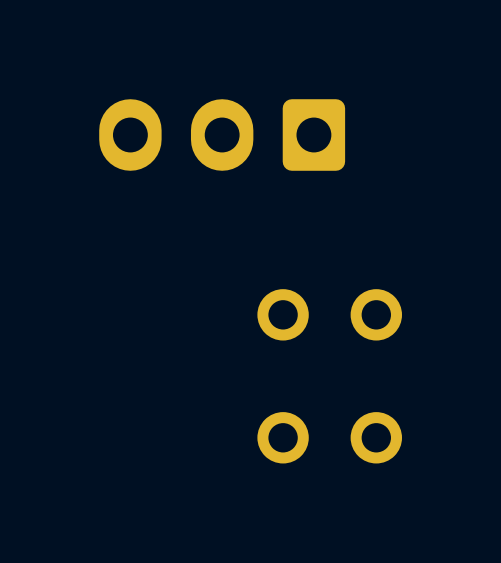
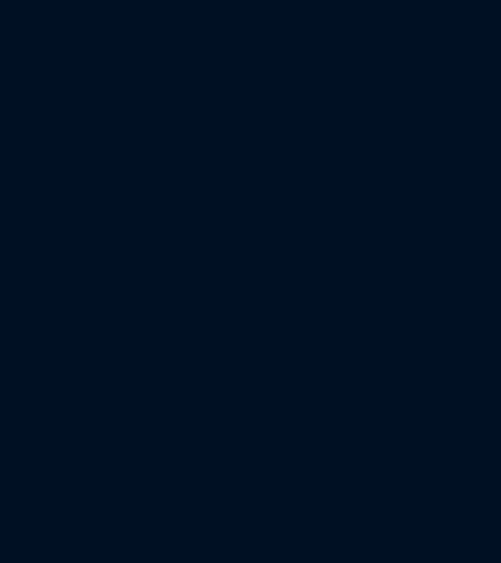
part: (222, 135) -> none
part: (329, 314) -> none
part: (329, 437) -> none

